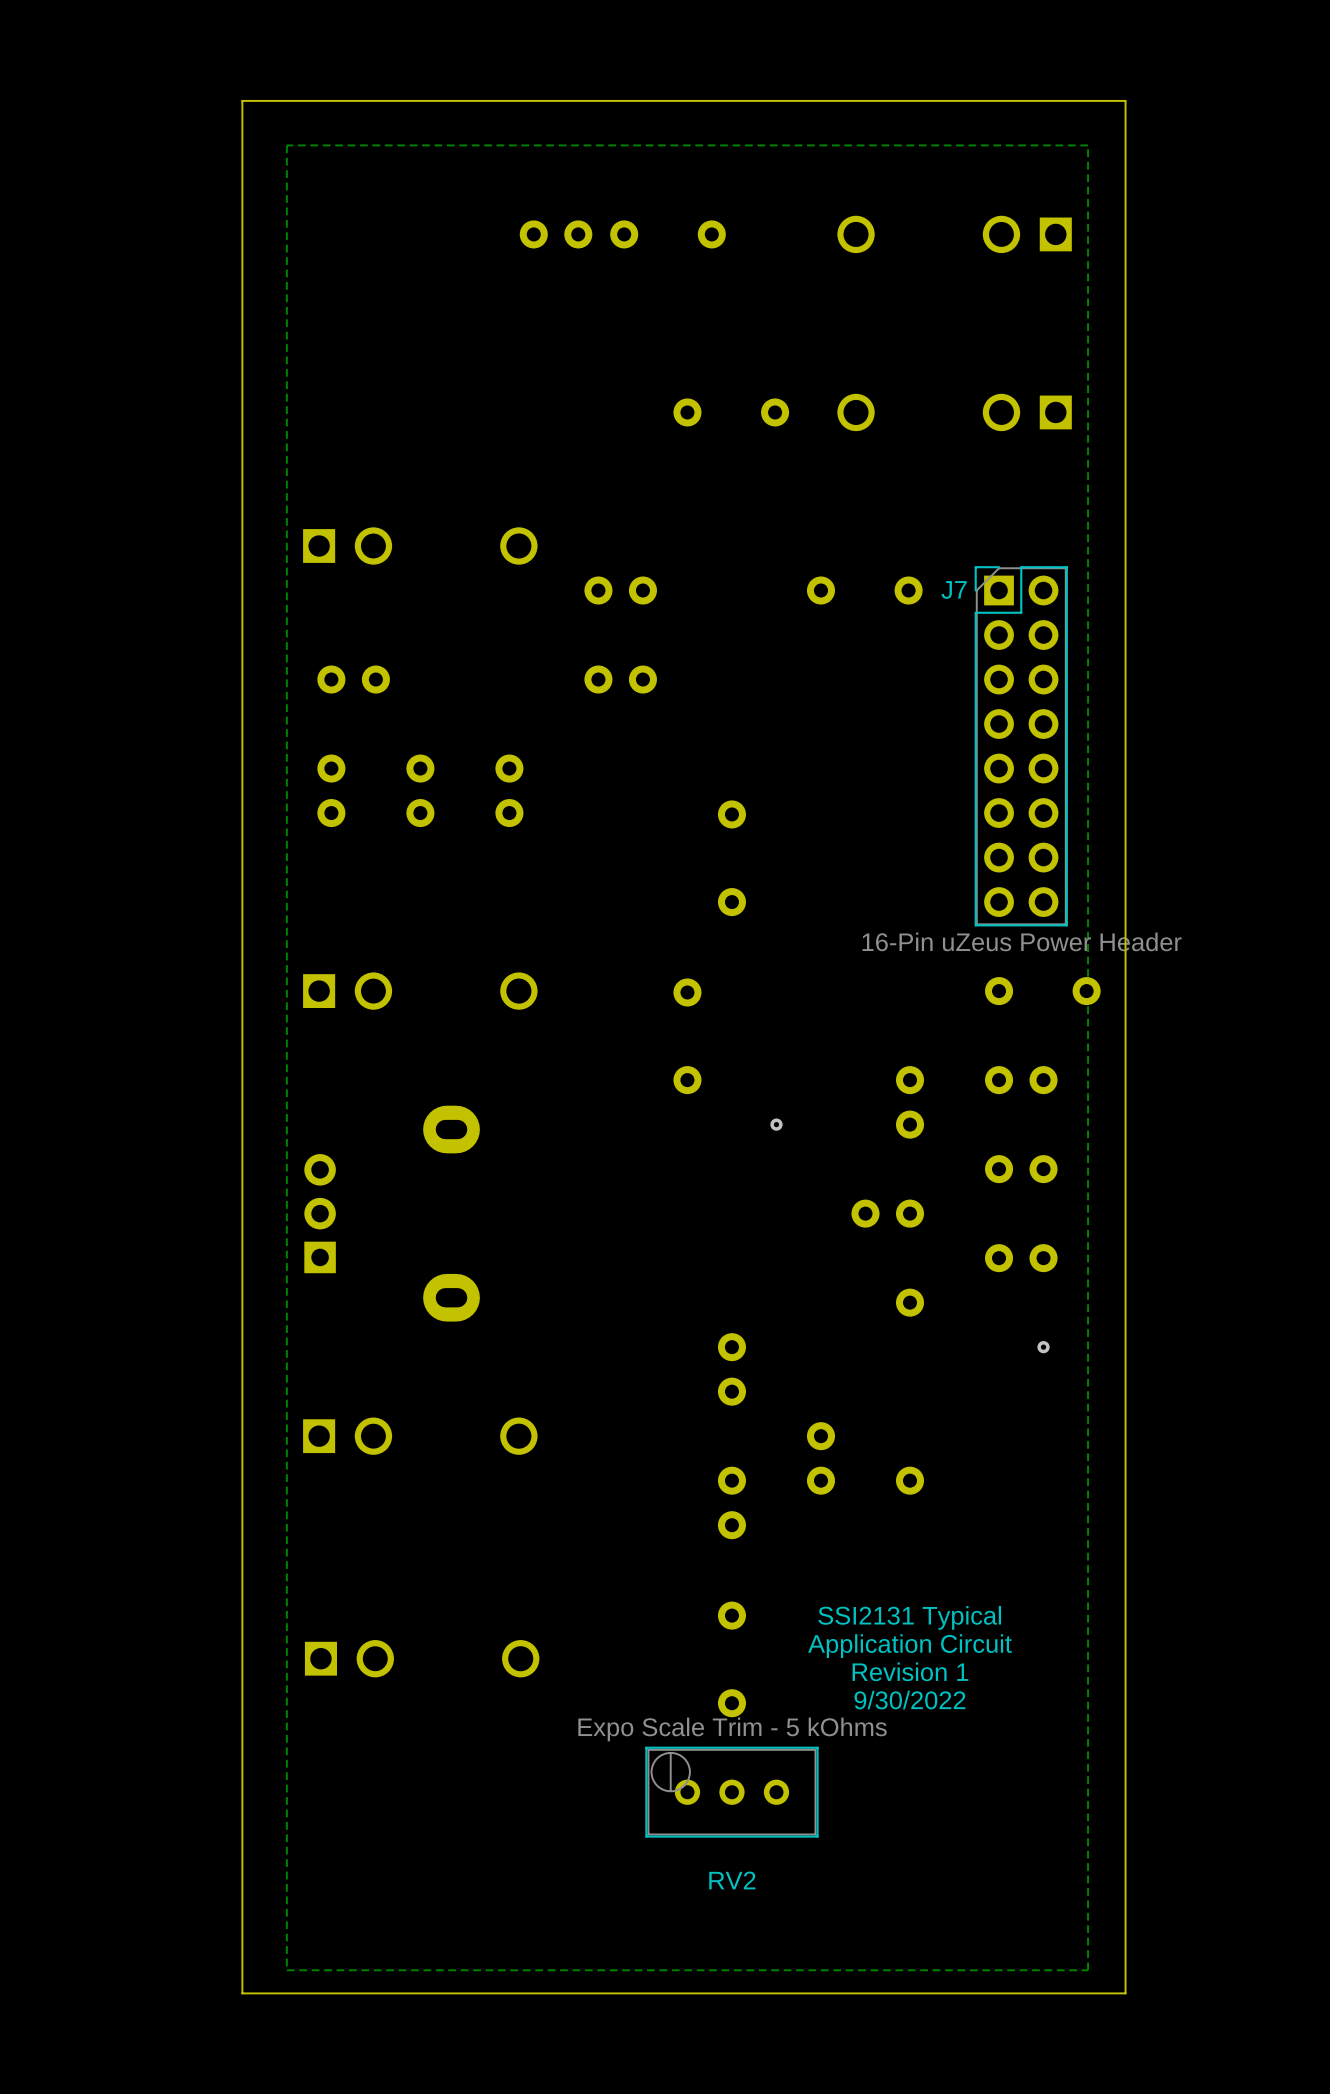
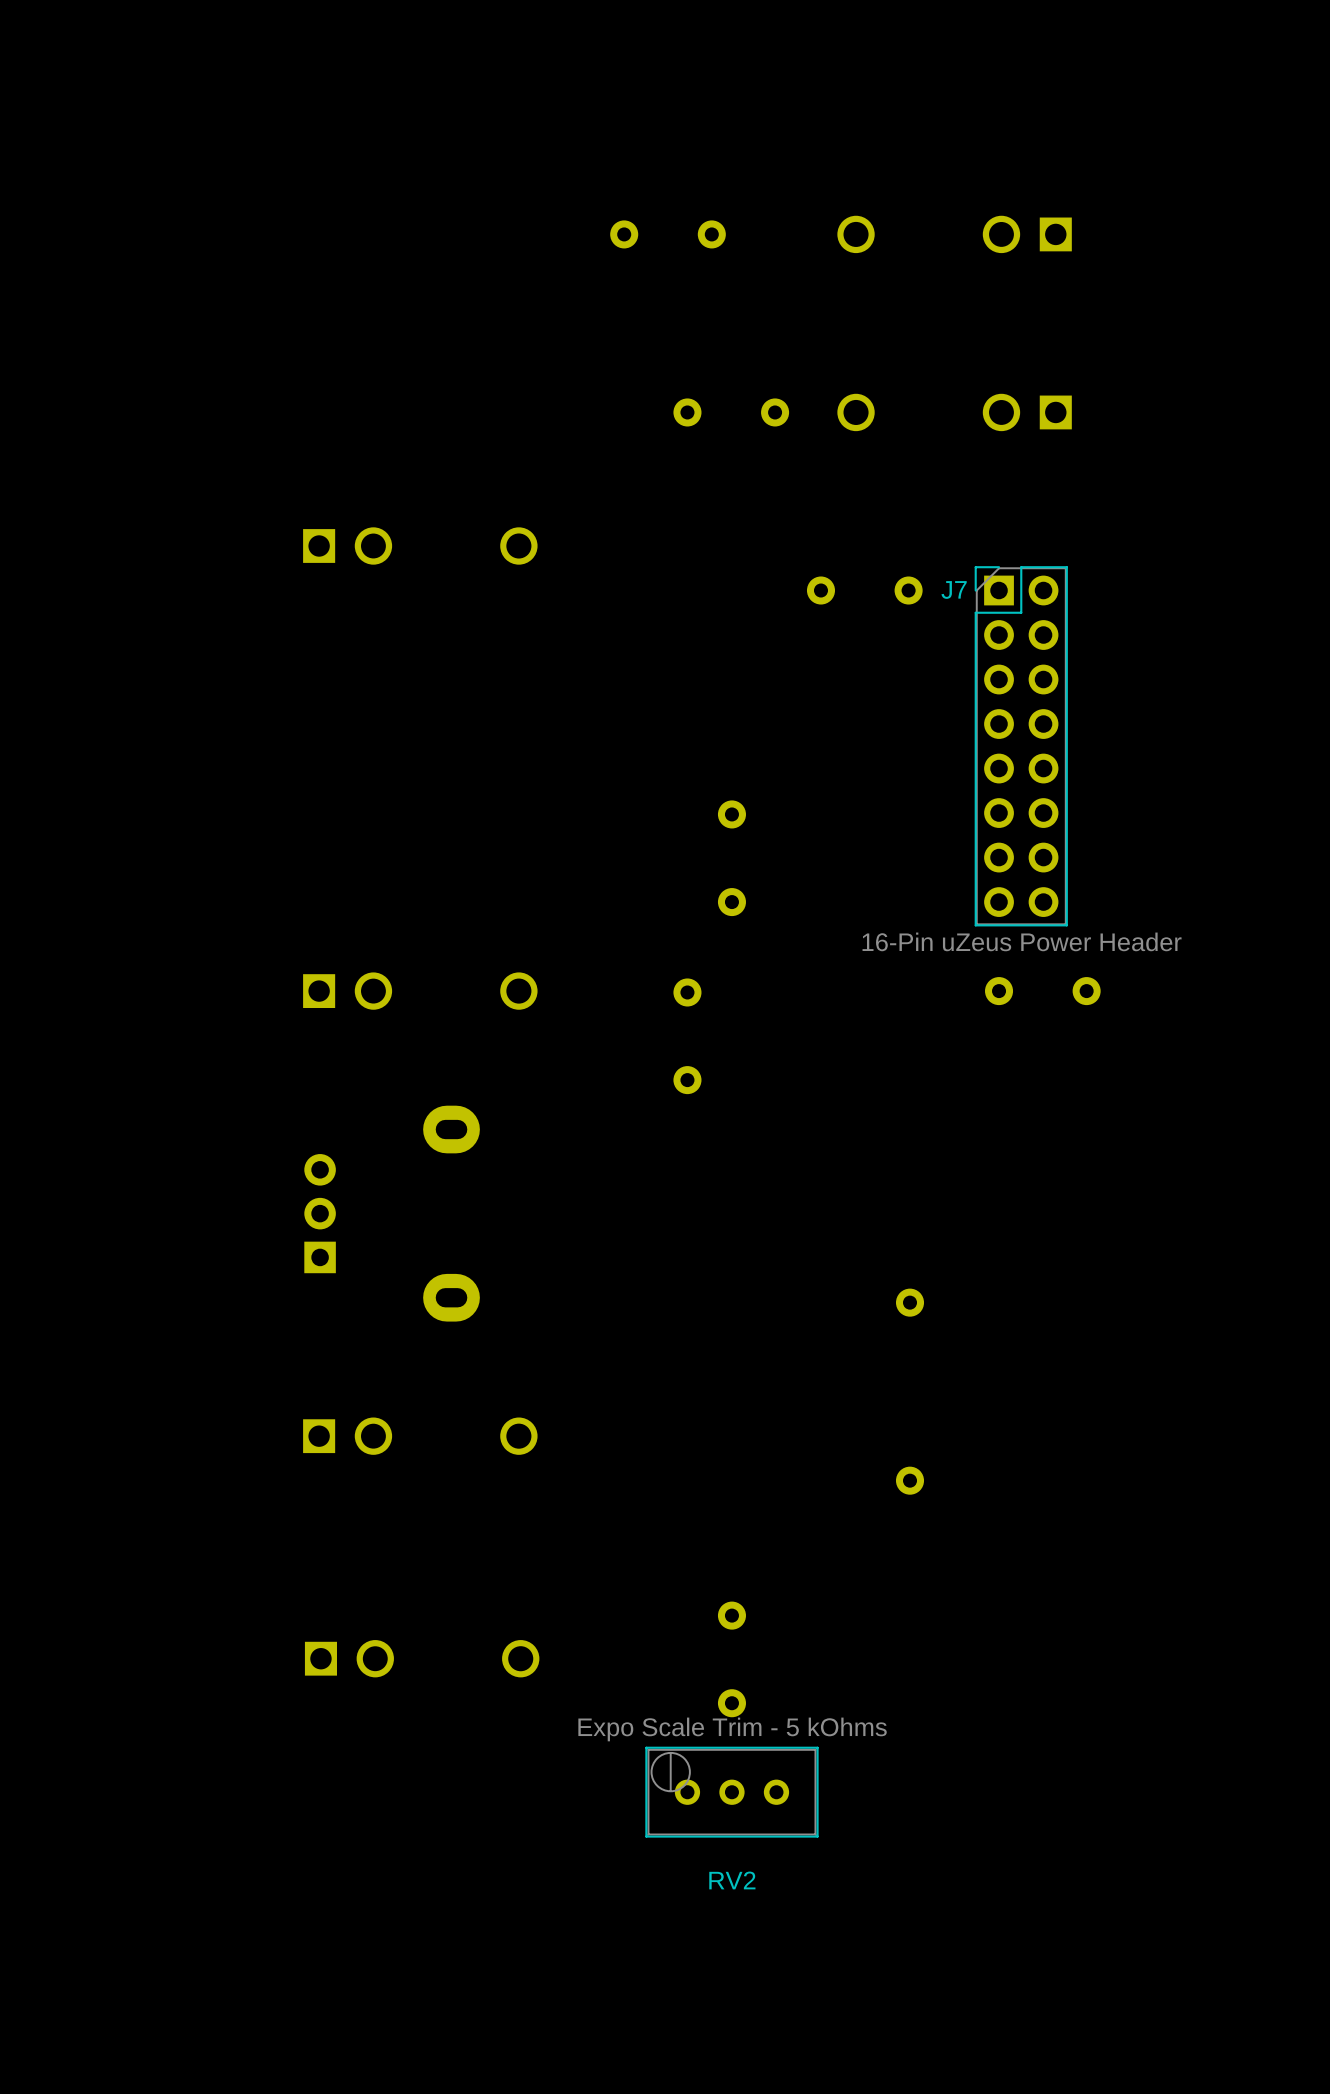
board edge: (1125, 100) (242, 100) (242, 1993) (1125, 1993) (1125, 100) -> none
zone outline: (1088, 145) (1088, 1970) (286, 1970) (286, 145) (1088, 145) -> none
part: (556, 234) -> none
part: (620, 590) -> none
part: (353, 679) -> none
part: (620, 679) -> none
part: (331, 790) -> none
part: (420, 790) -> none
part: (509, 790) -> none
part: (1021, 1080) -> none
part: (910, 1102) -> none
via: (776, 1124) -> none
part: (1021, 1169) -> none
part: (887, 1213) -> none
part: (1021, 1258) -> none
via: (1043, 1347) -> none
part: (731, 1369) -> none
part: (820, 1458) -> none
part: (731, 1502) -> none
text: SSI2131 Typical (909, 1617) -> none
text: Application Circuit (909, 1646) -> none
text: Revision 1 (910, 1671) -> none
text: 9/30/2022 (909, 1700) -> none

